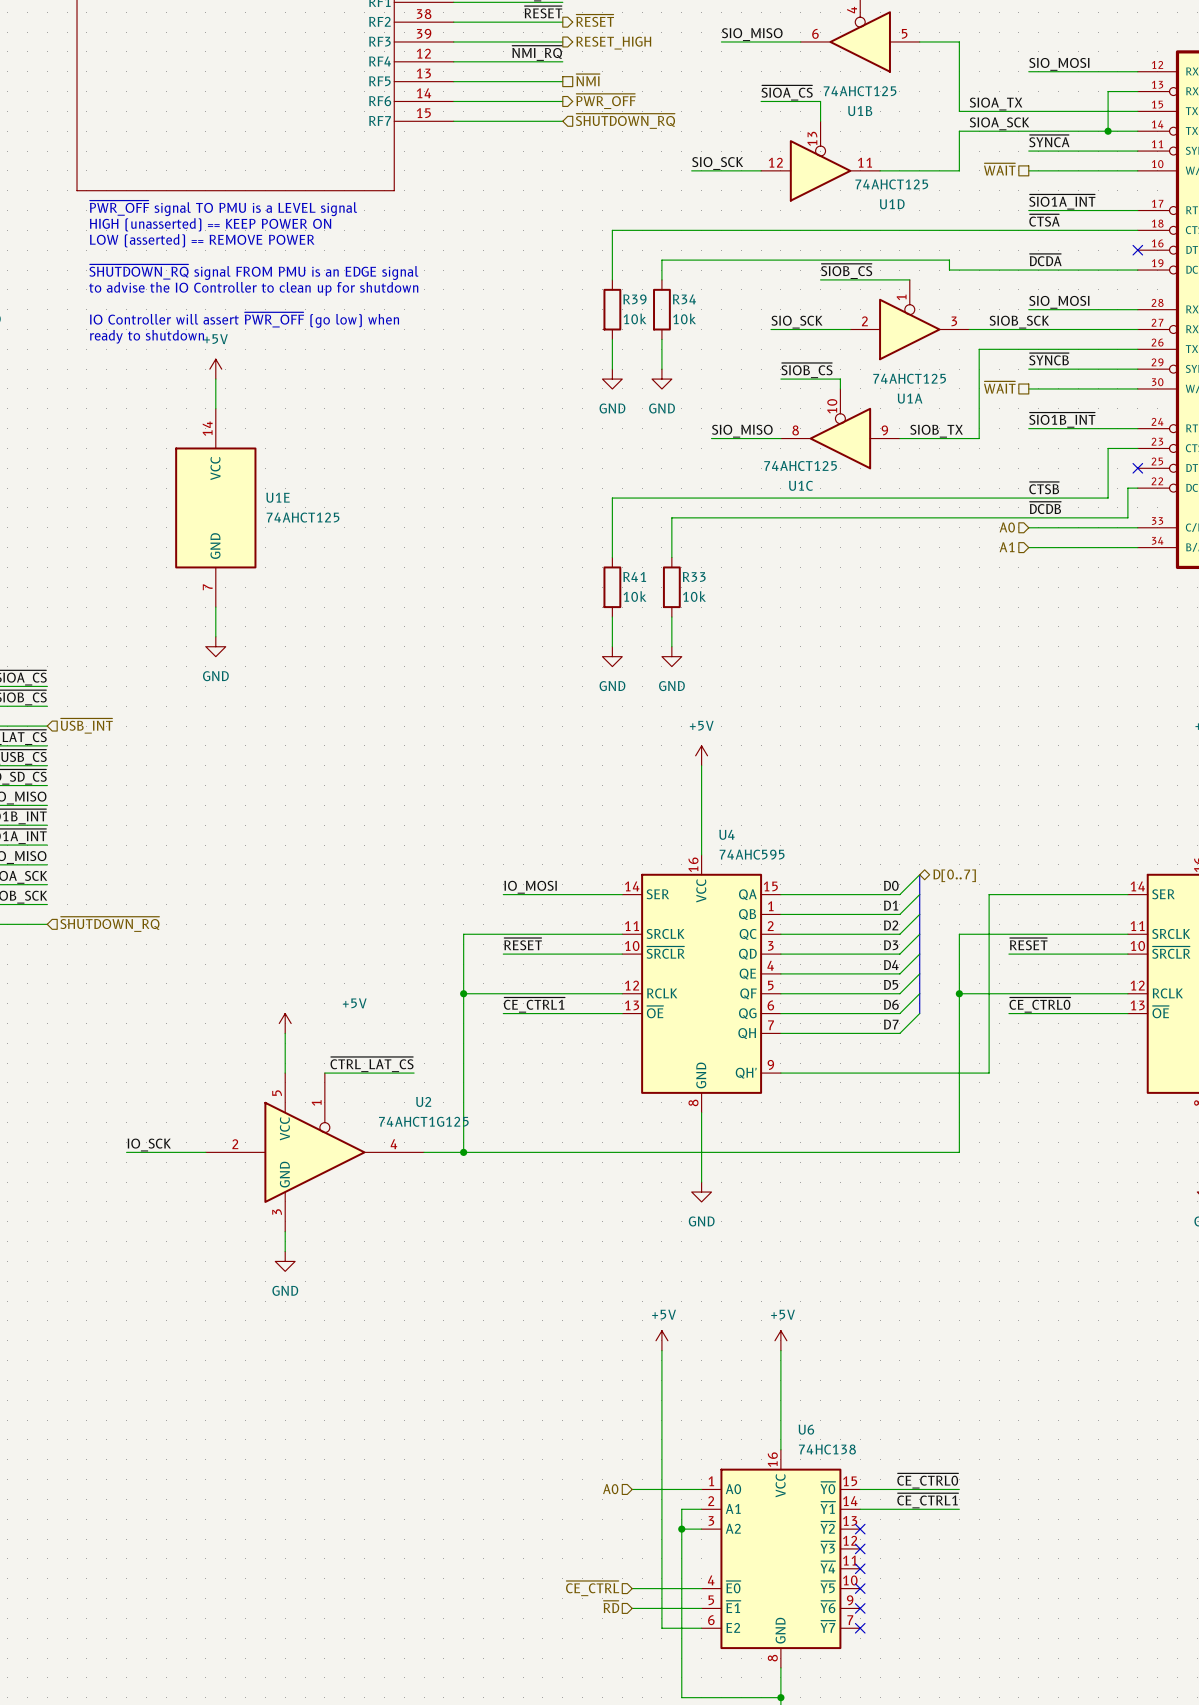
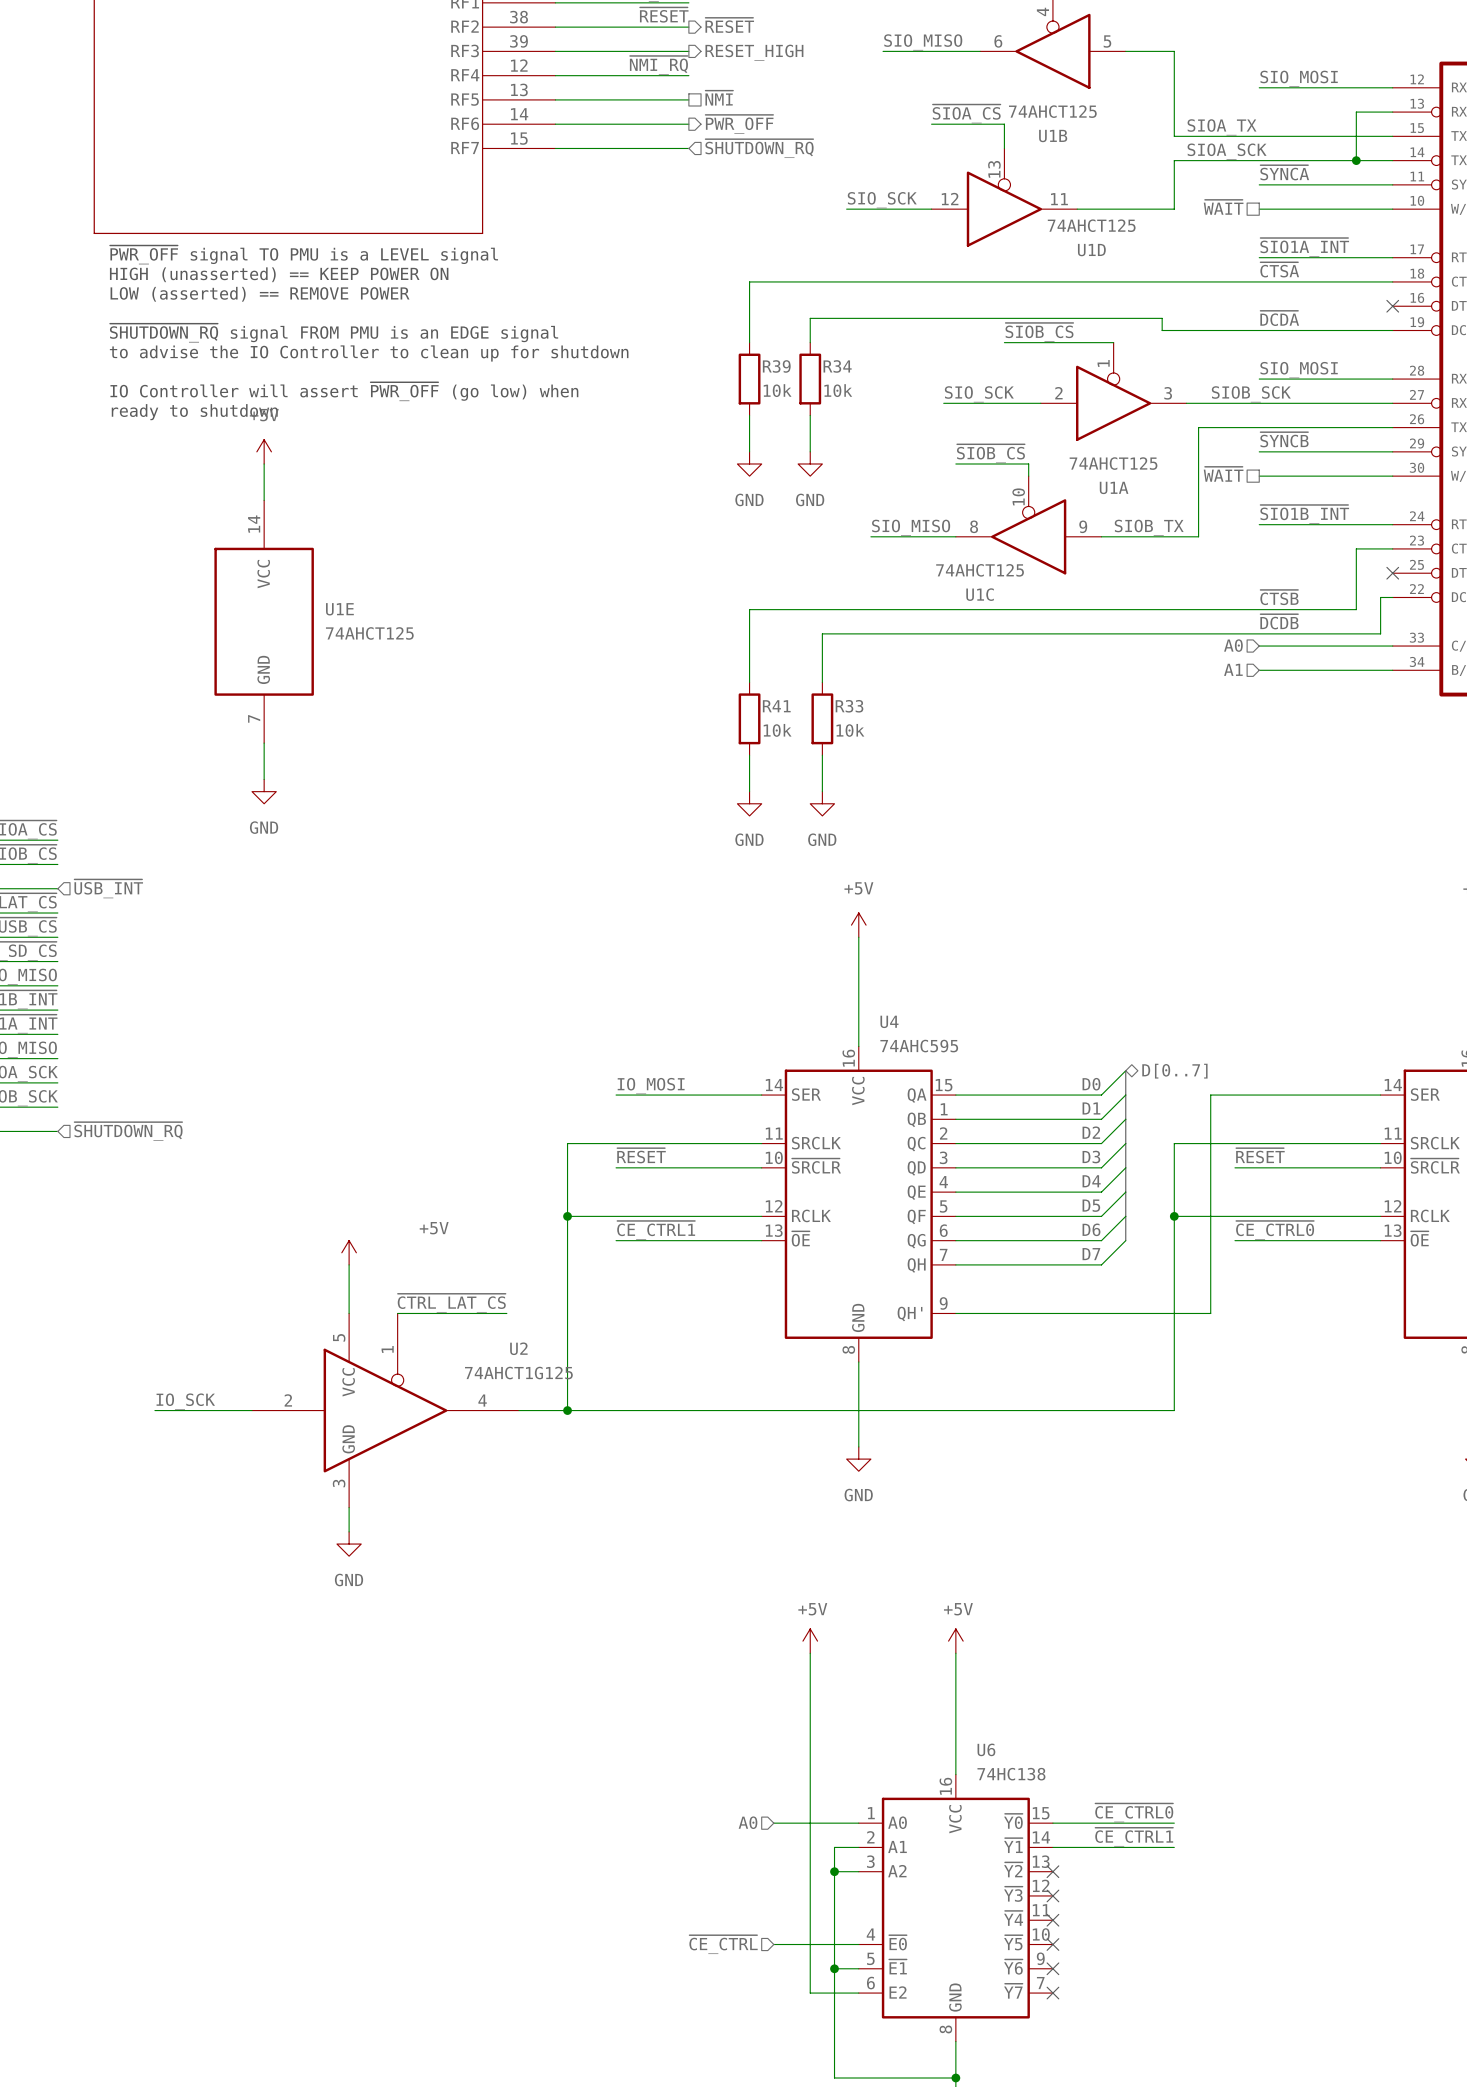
hierarchical label: ~{RD} (611, 1606) -> none
wire: (632, 1608) (681, 1608) -> none
junction: none -> (834, 1968)

